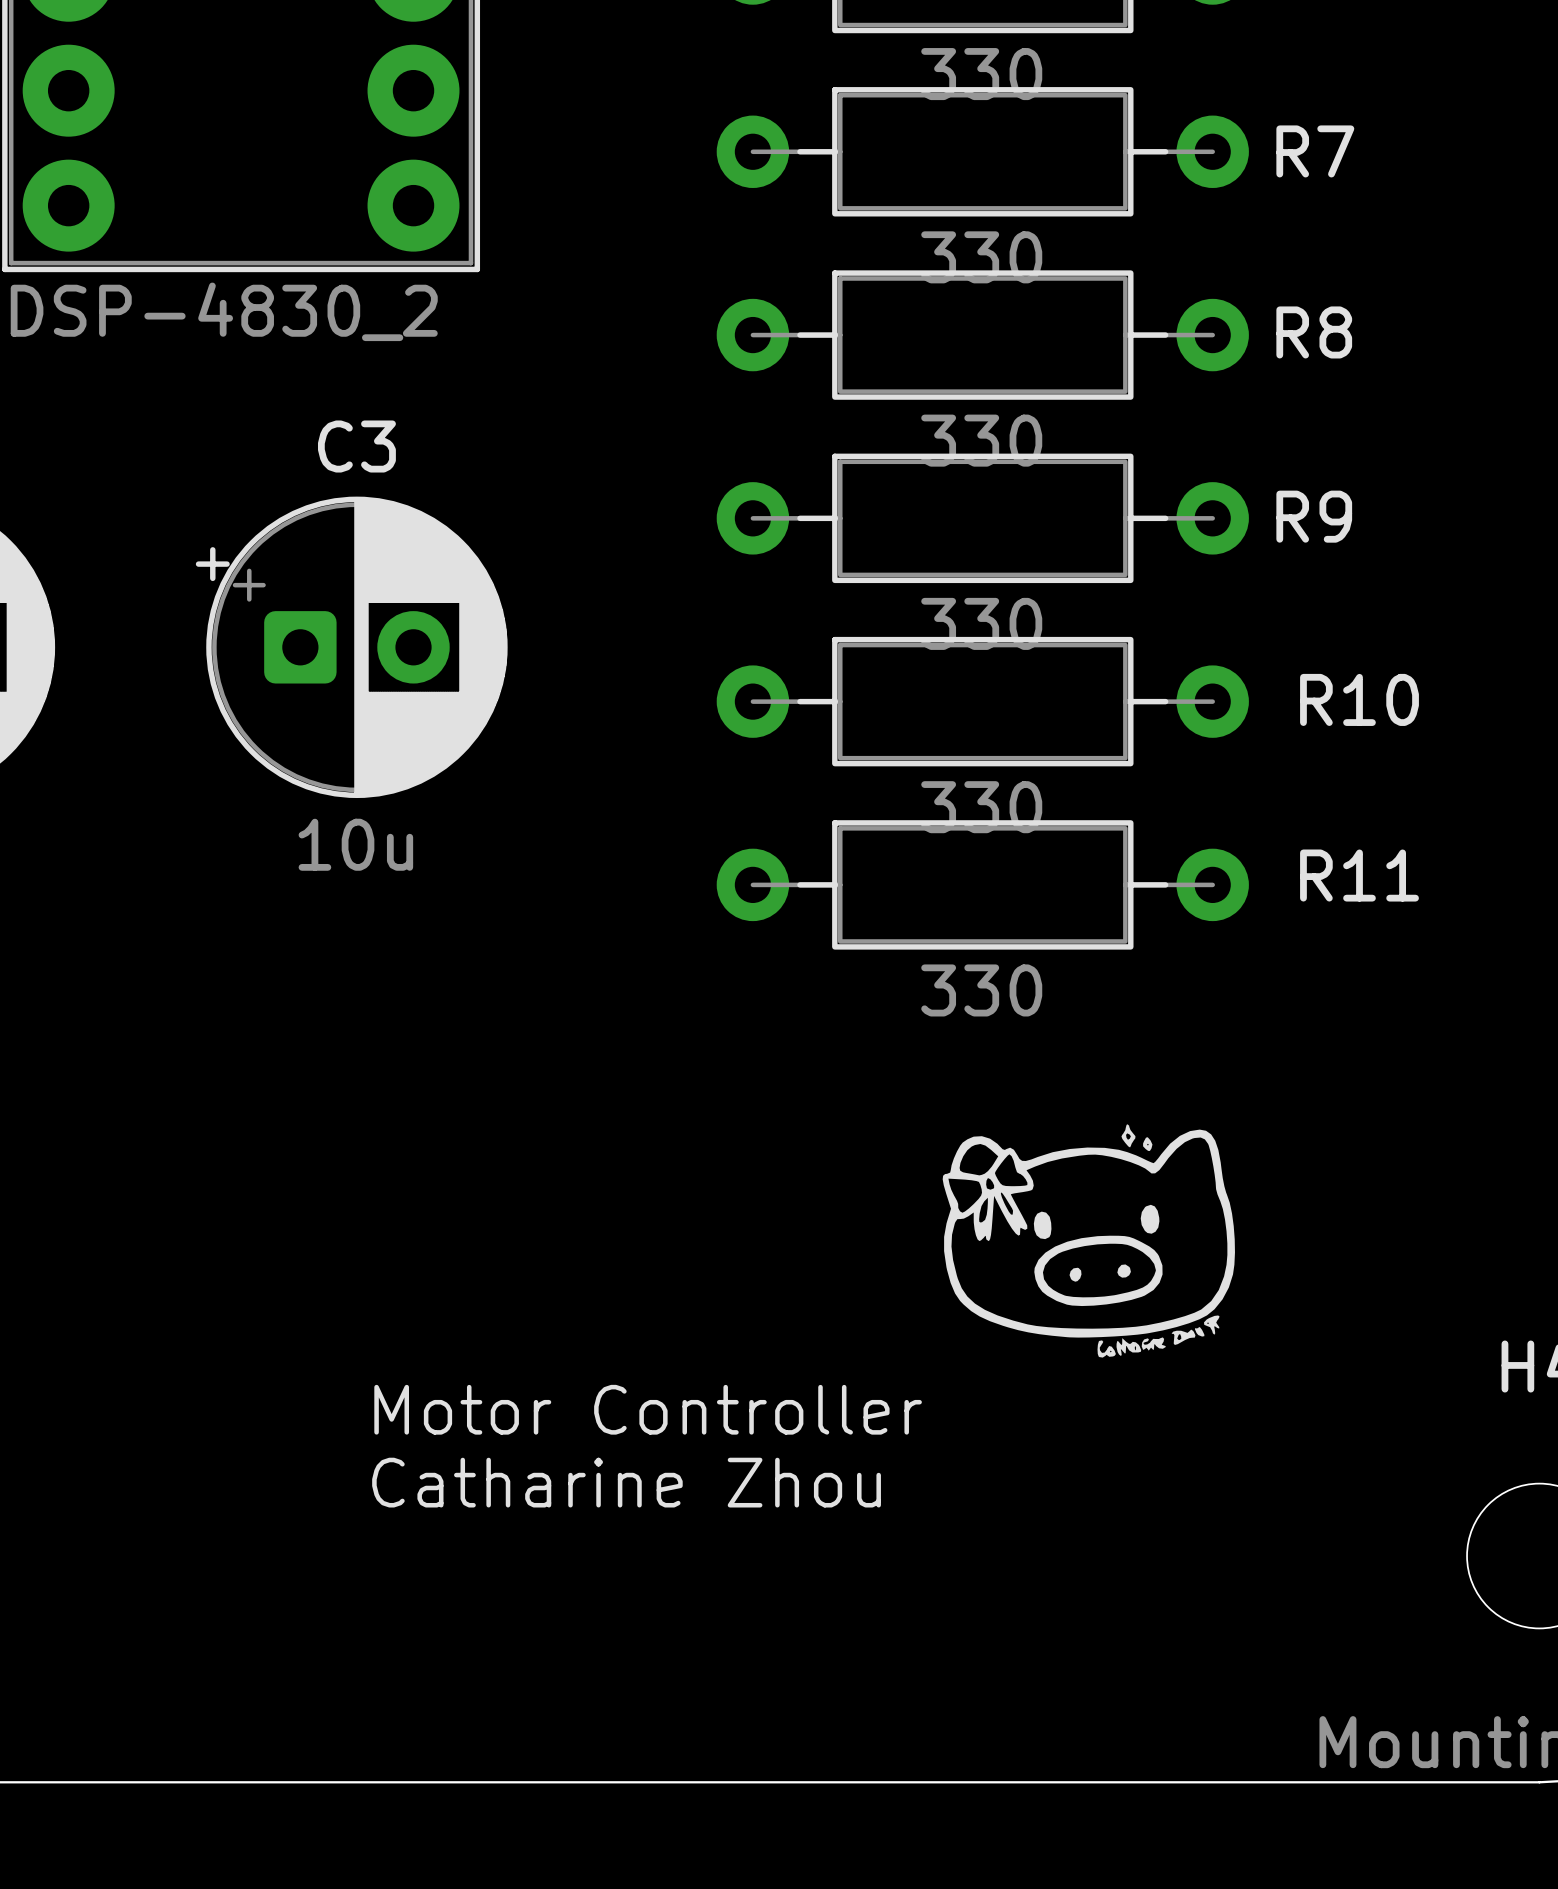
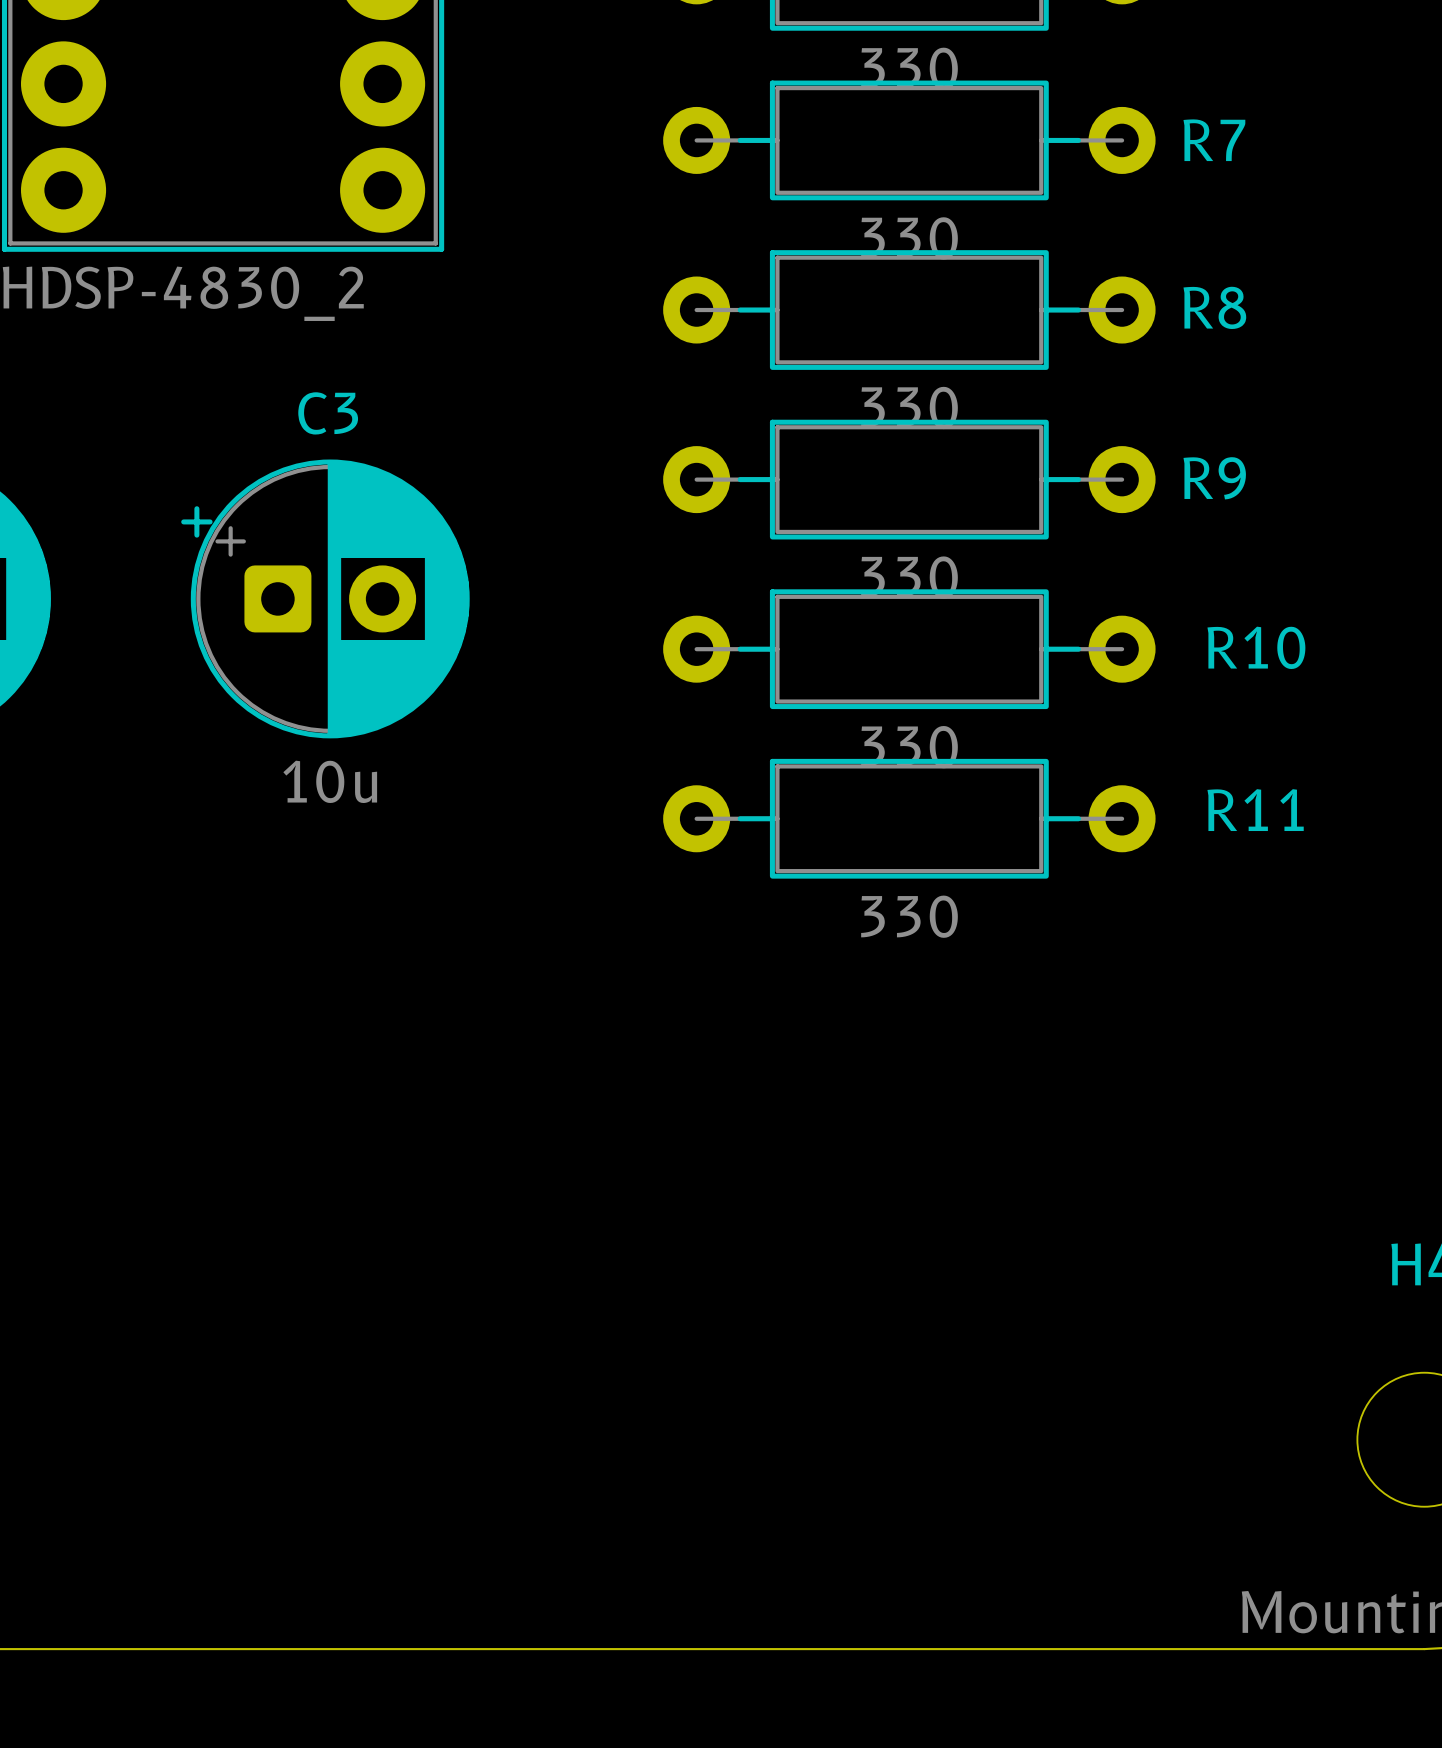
drawing: [942, 1124, 1235, 1358] -> none
text: Motor Controller (648, 1409) -> none
text: Catharine Zhou (626, 1482) -> none

